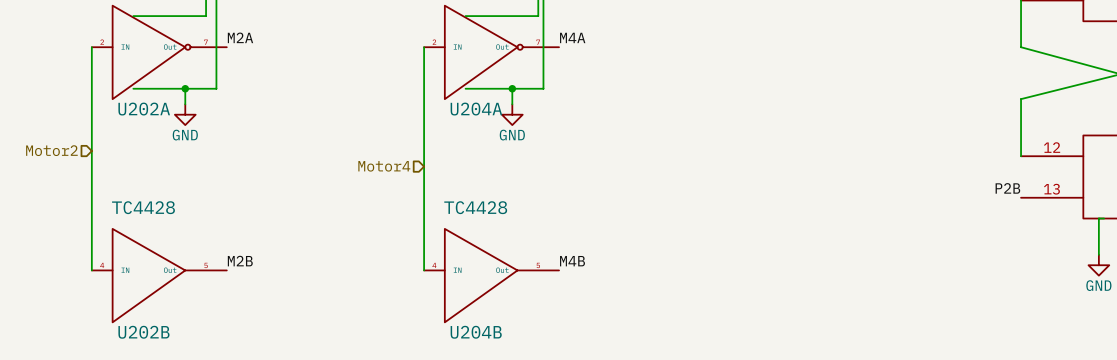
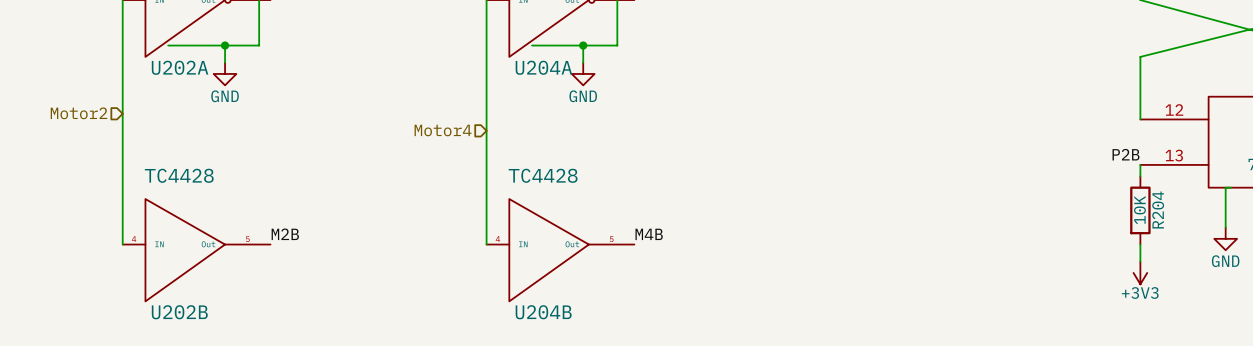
wire: none -> (1140, 164) (1140, 176)
R204: none -> 10K (1140, 210)
wire: none -> (1140, 244) (1140, 261)
power symbol: none -> +3V3 (1140, 272)

